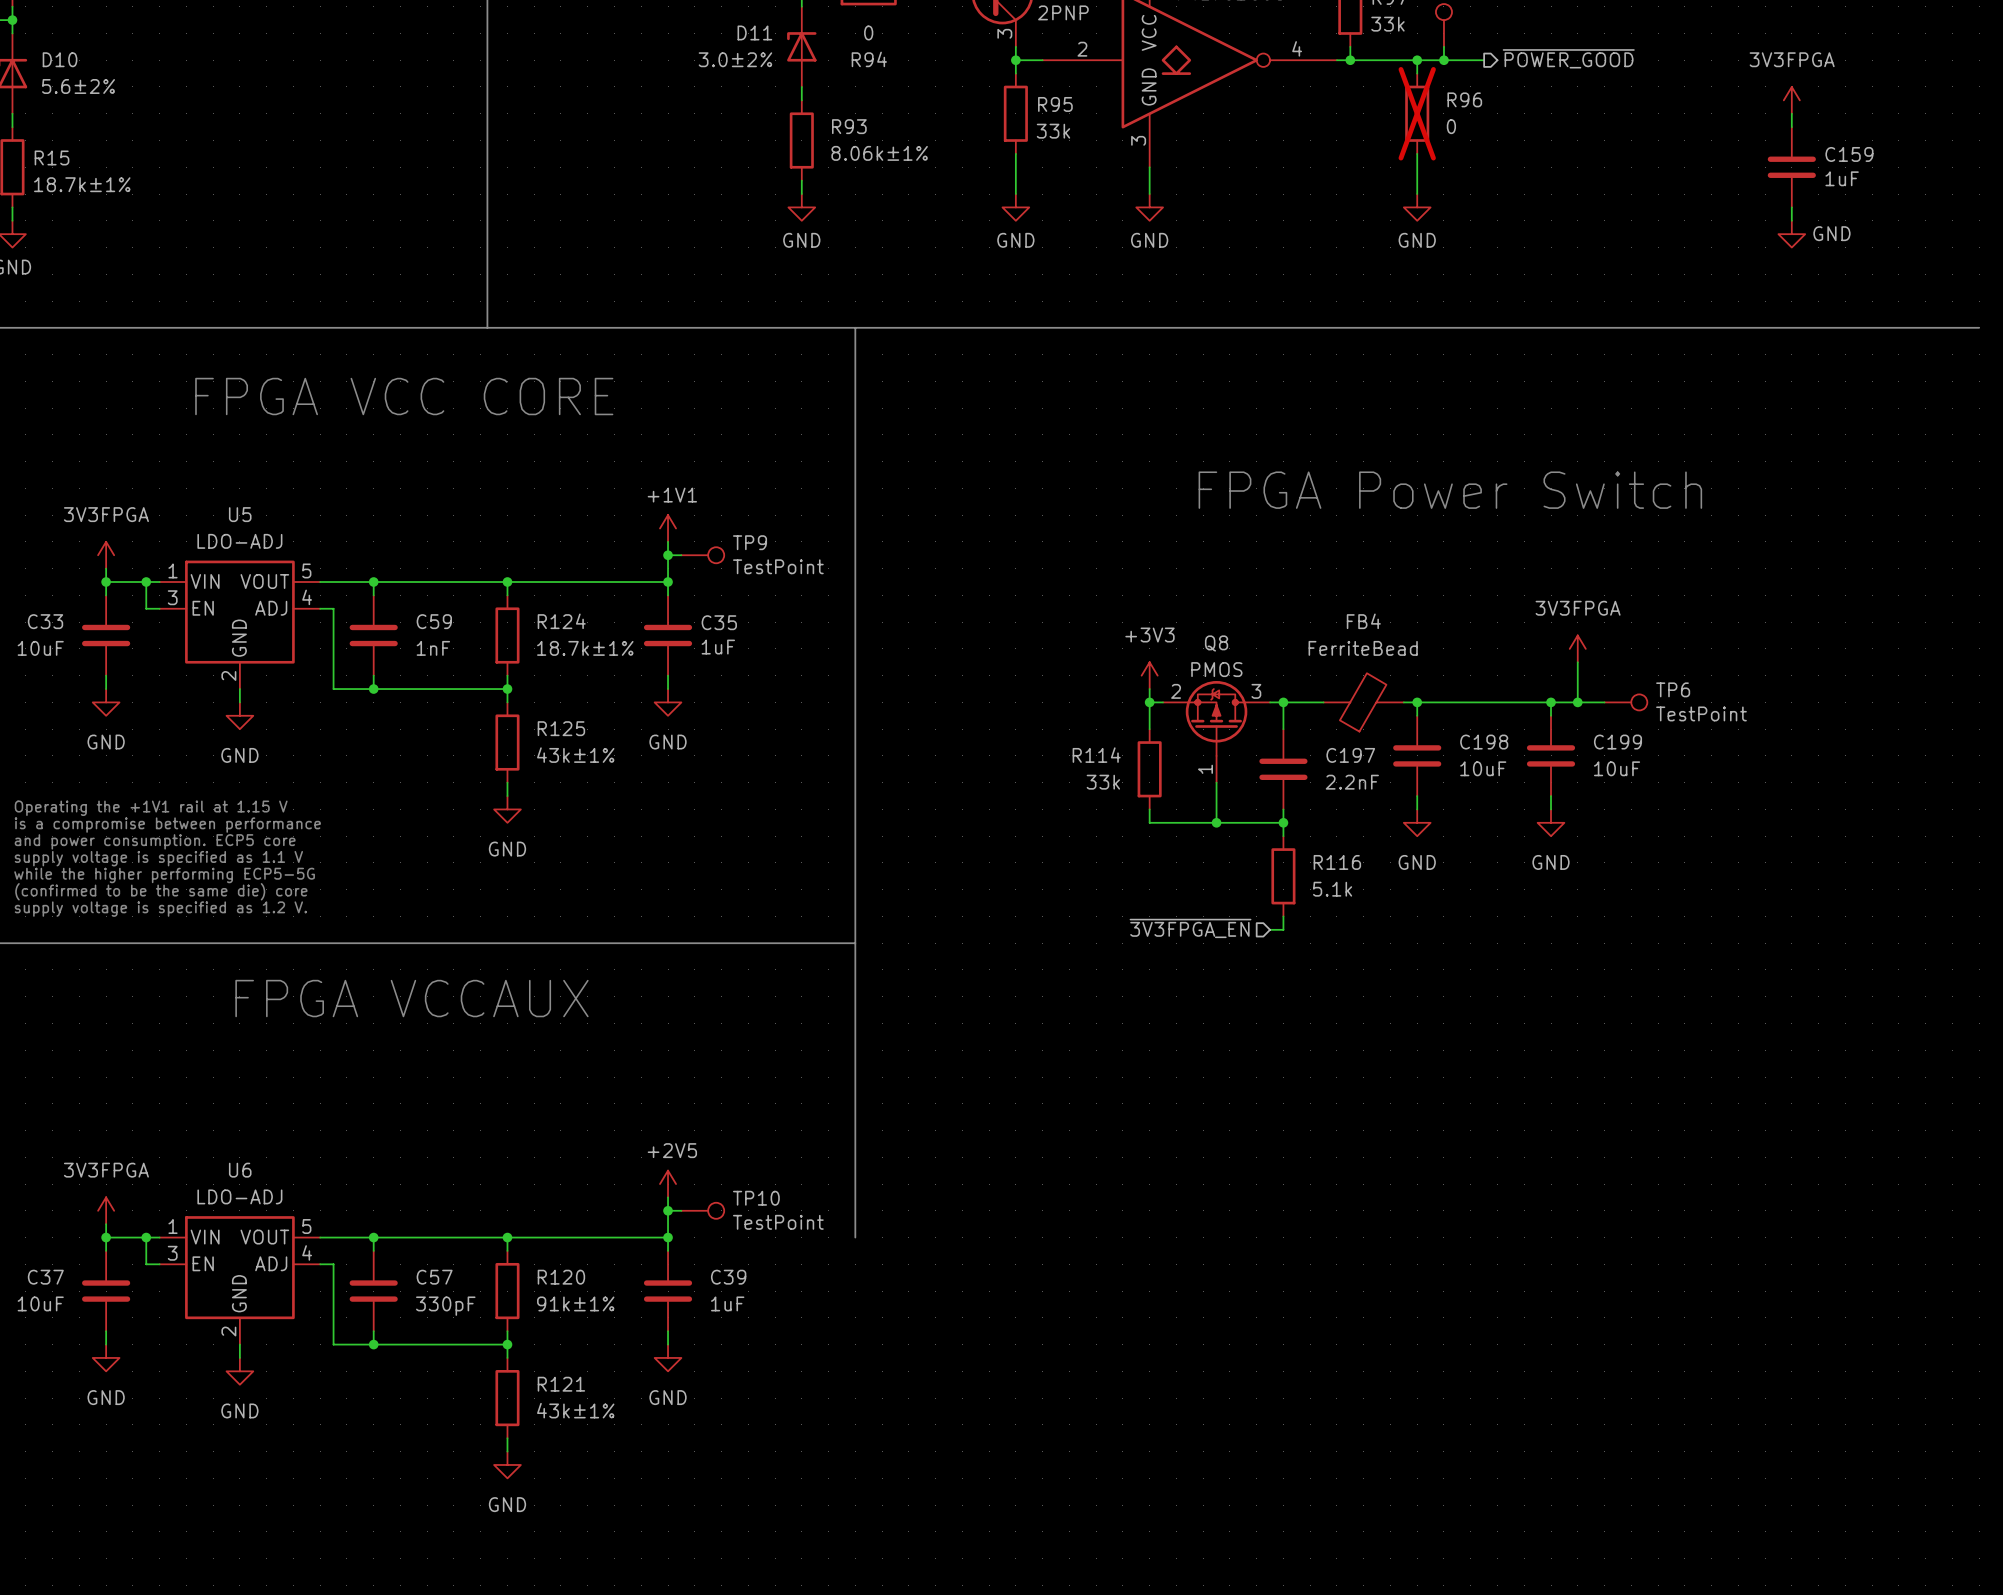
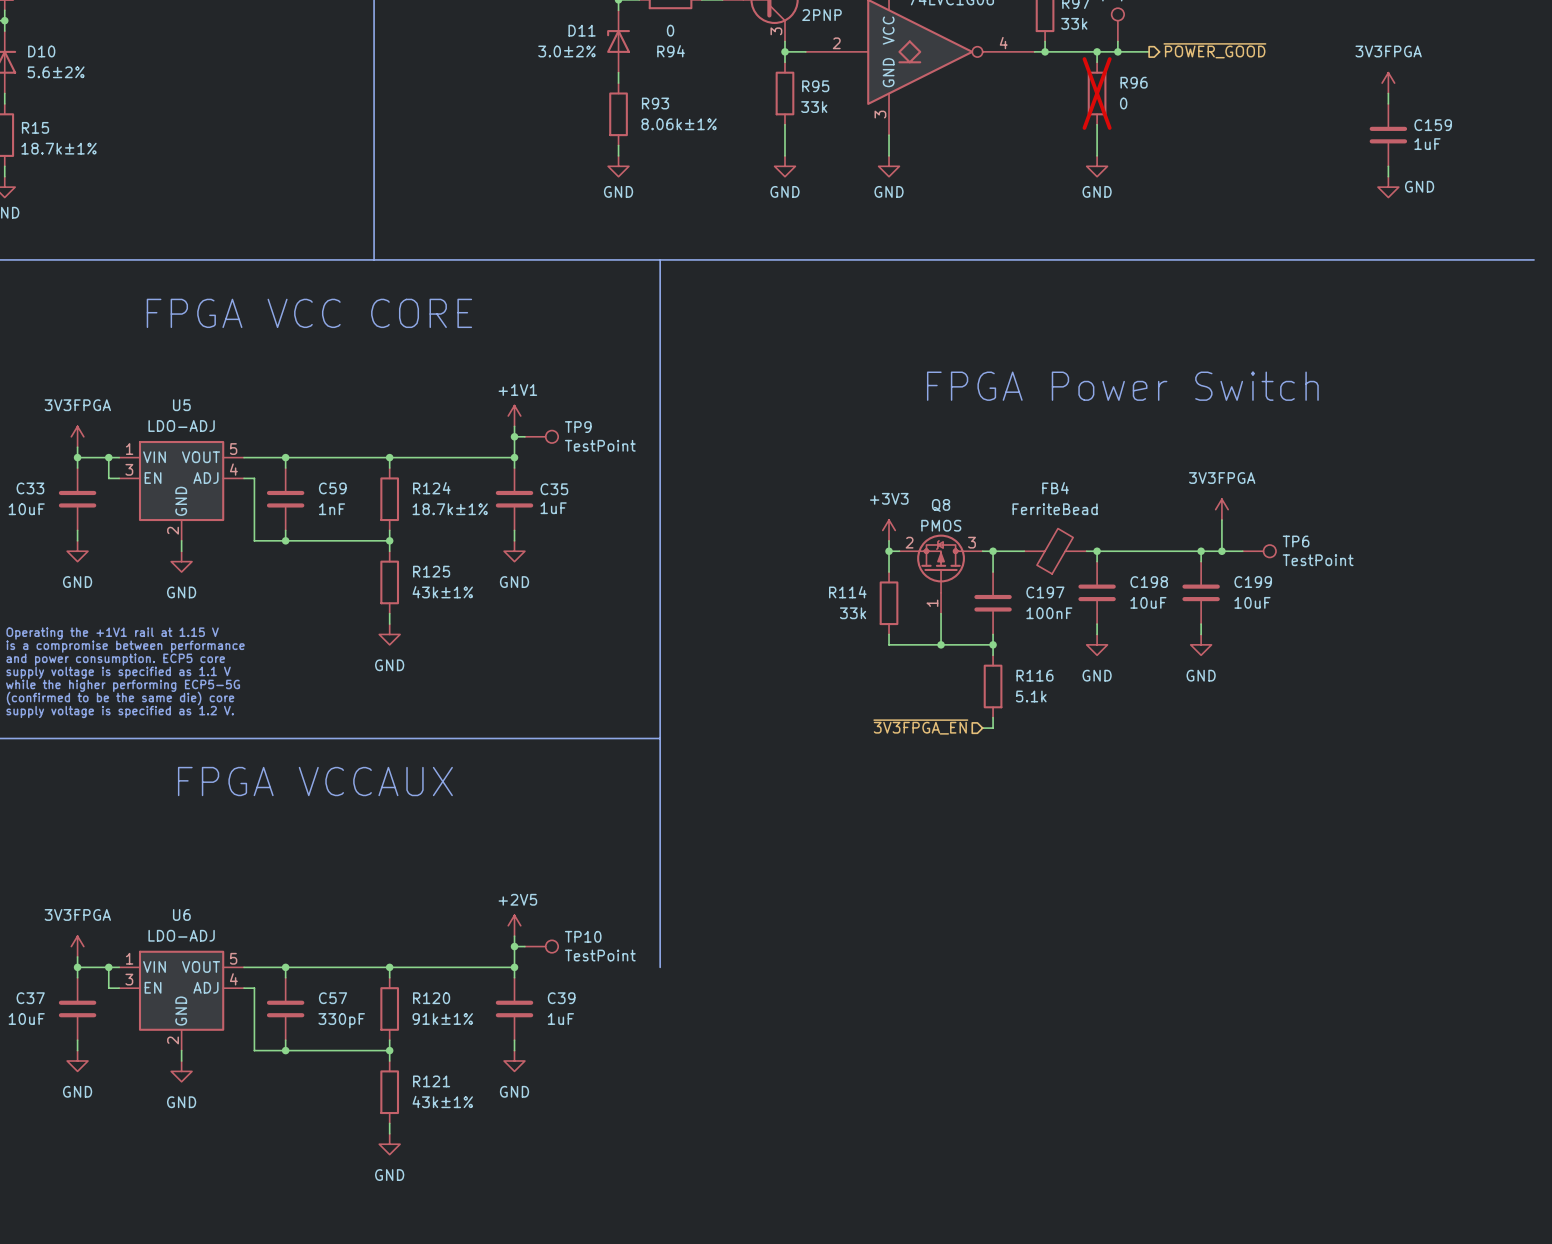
C197 value: 2.2nF (1352, 782) -> 100nF (1049, 613)

